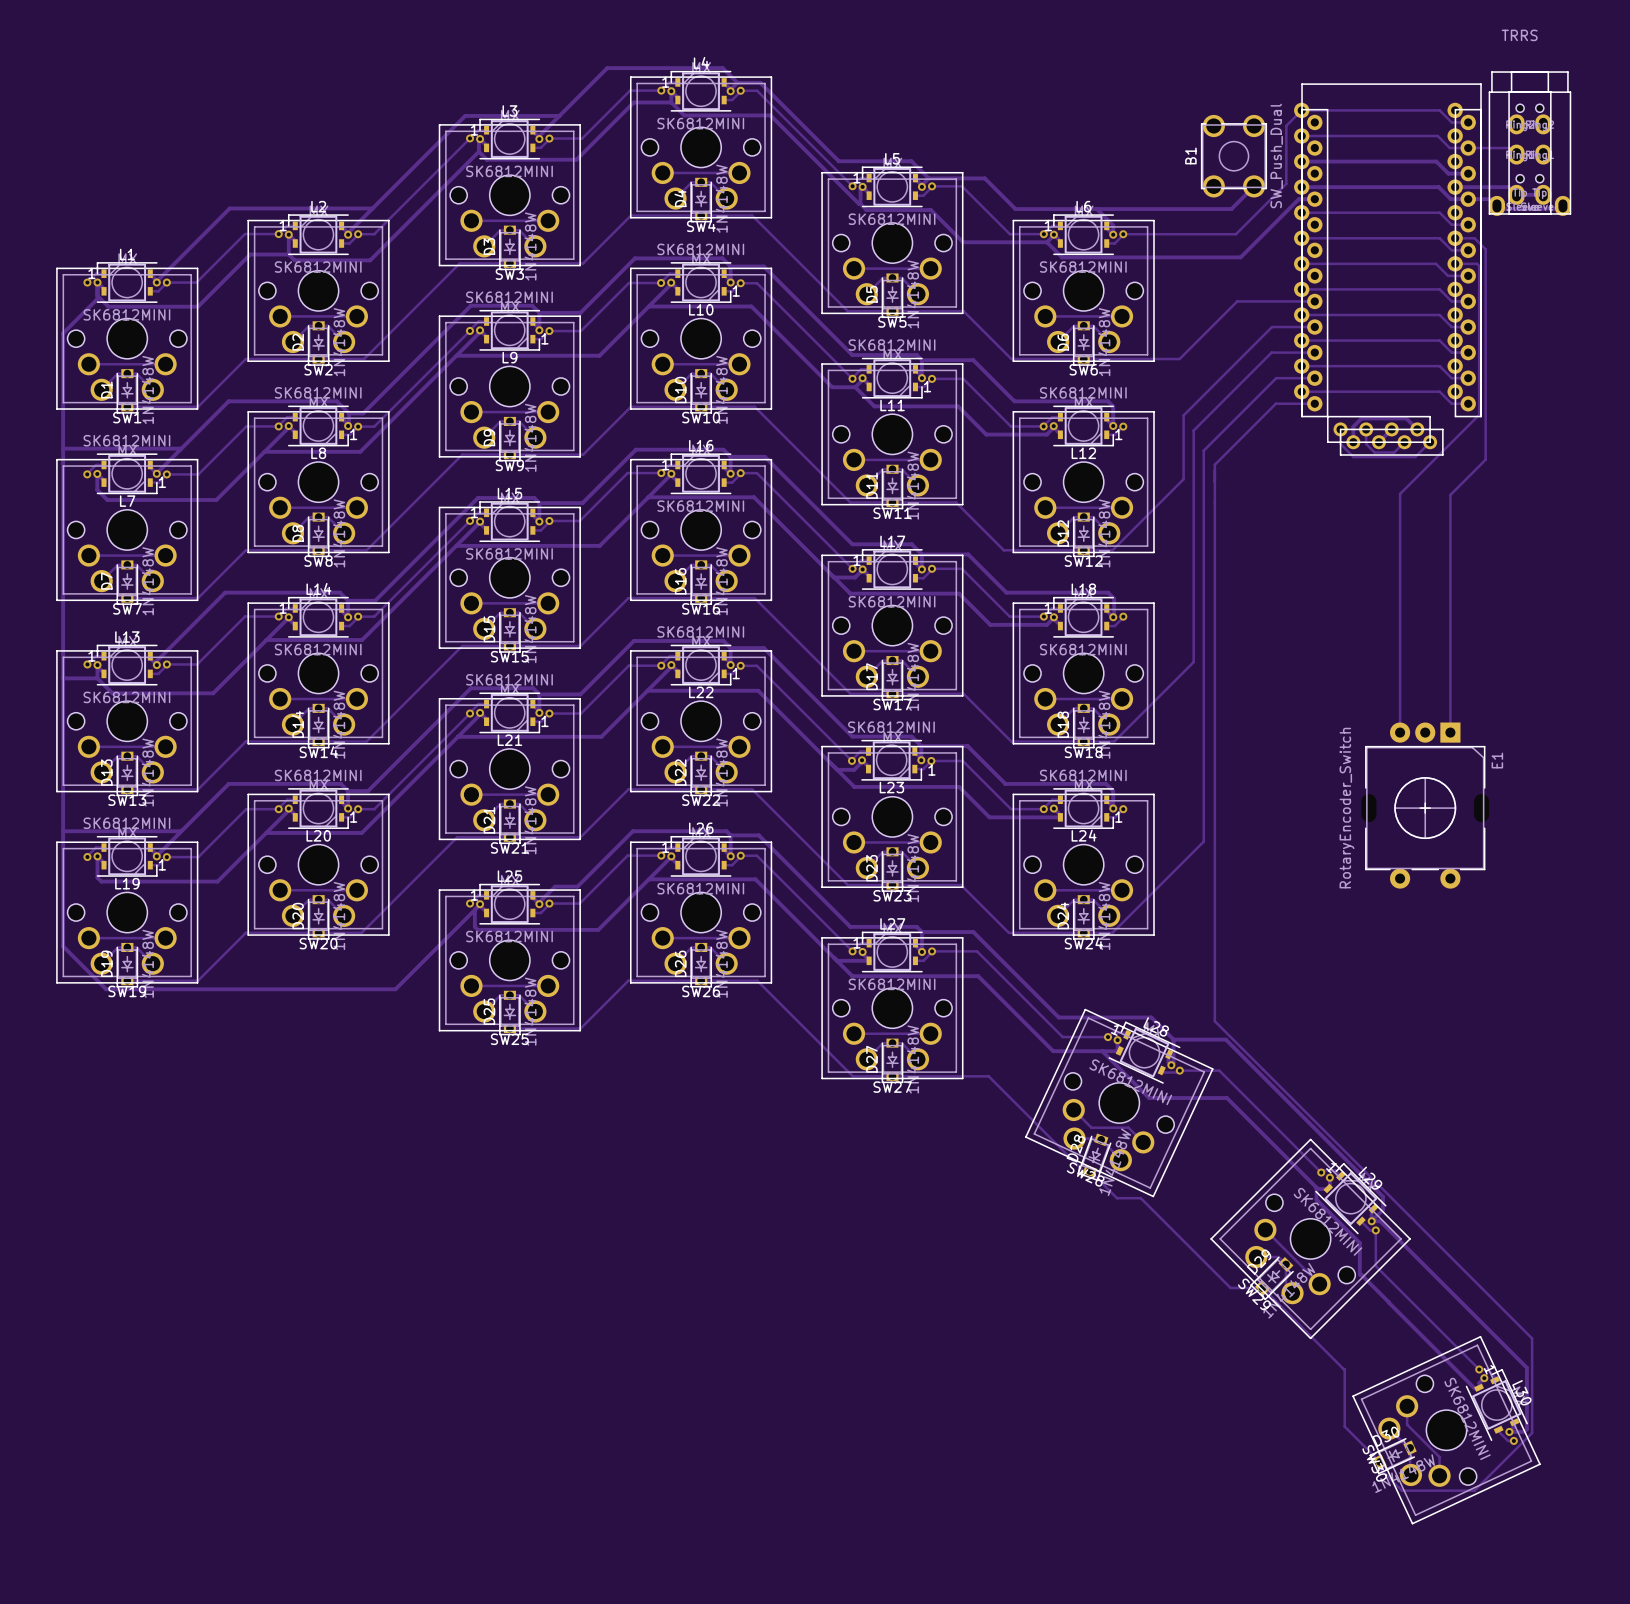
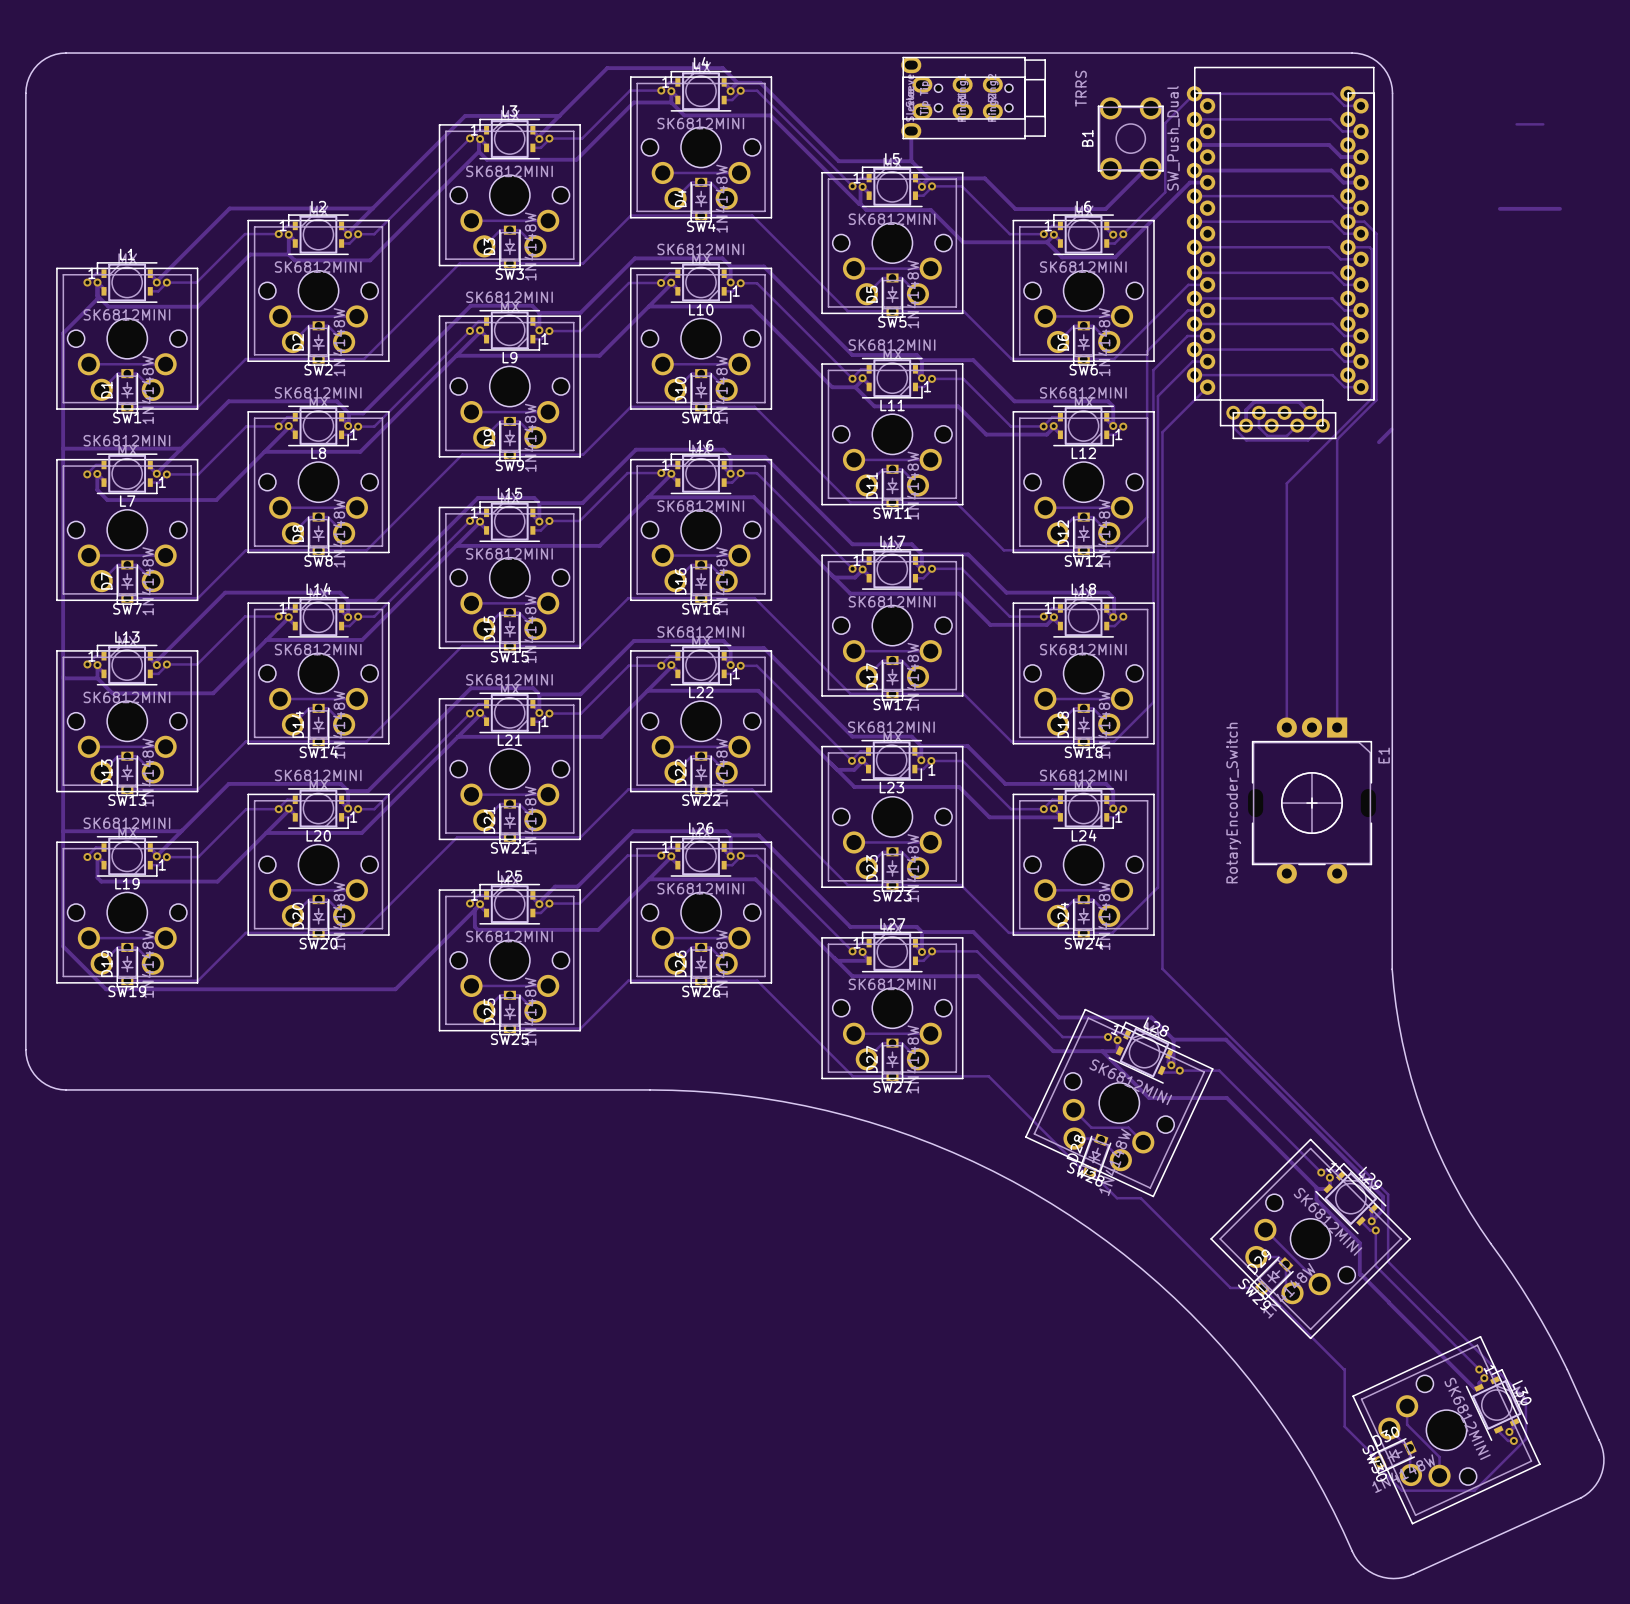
board edge: none -> (66, 53) (1352, 53) (1367, 56) (1380, 64) (1389, 77) (1392, 93) (1392, 969) (1396, 1005) (1402, 1042) (1416, 1095) (1443, 1164) (1470, 1212) (1541, 1320) (1567, 1369) (1600, 1444) (1603, 1458) (1603, 1467) (1598, 1481) (1592, 1488) (1581, 1497) (1408, 1575) (1388, 1578) (1373, 1573) (1364, 1568) (1354, 1556) (1312, 1472) (1263, 1397) (1221, 1346) (1158, 1283) (1088, 1228) (1012, 1181) (932, 1143) (847, 1116) (782, 1101) (694, 1091) (66, 1089) (50, 1086) (37, 1078) (28, 1065) (25, 1049) (25, 93) (28, 77) (37, 64) (50, 56) (66, 53)
part: none -> TRRS (973, 98)
track: none -> (1194, 119) (1330, 119) (1342, 131) (1360, 131)
track: (1468, 122) (1451, 122) (1439, 110) (1301, 110) (1286, 125) (1286, 183) (1235, 234) (1123, 234) -> (1360, 105) (1344, 105) (1332, 93) (1194, 93) (1165, 123) (1165, 192) (1123, 234)
track: none -> (911, 131) (911, 161)
track: (1301, 135) (1437, 135) (1449, 148) (1510, 148) (1516, 154) (1543, 154) -> none
part: TRRS (1529, 143) -> none
B1 position: (1233, 156) -> (1130, 138)
track: (1301, 161) (1436, 161) (1448, 173) (1468, 173) -> (1194, 144) (1329, 144) (1341, 157) (1360, 157)
track: none -> (1194, 170) (1331, 170) (1343, 182) (1360, 182)
track: (1254, 186) (1231, 209) (1105, 209) -> (1150, 163) (1105, 209)
track: (1301, 187) (1438, 187) (1450, 199) (1490, 199) (1496, 205) -> none
track: (1455, 187) (1508, 187) (1516, 194) (1543, 194) -> none
track: (1314, 199) (1298, 199) (1240, 257) (1115, 257) -> (1207, 182) (1189, 182) (1115, 257)
track: (1096, 209) (1113, 225) (1113, 234) -> none
track: (1301, 212) (1439, 212) (1451, 224) (1468, 224) -> (1194, 196) (1332, 196) (1344, 208) (1360, 208)
track: none -> (1347, 221) (1364, 221) (1376, 233) (1376, 400) (1337, 439) (1337, 727)
track: (1301, 238) (1439, 238) (1451, 250) (1468, 250) -> (1194, 221) (1332, 221) (1344, 233) (1360, 233)
track: (1455, 238) (1474, 238) (1485, 249) (1485, 459) (1450, 494) (1450, 732) -> none
track: none -> (1347, 247) (1369, 247) (1371, 249) (1371, 398) (1286, 483) (1286, 727)
part position: (1387, 250) -> (1280, 233)
track: (1301, 263) (1435, 263) (1448, 275) (1468, 275) -> (1194, 247) (1328, 247) (1340, 259) (1360, 259)
track: (1455, 263) (1477, 263) (1479, 266) (1479, 414) (1400, 493) (1400, 732) -> none
track: (1301, 289) (1439, 289) (1451, 301) (1468, 301) -> (1194, 272) (1332, 272) (1344, 284) (1360, 284)
track: (1314, 301) (1237, 301) (1179, 359) (1114, 359) -> (1207, 284) (1188, 284) (1114, 359)
track: (1301, 314) (1439, 314) (1451, 327) (1468, 327) -> (1194, 298) (1332, 298) (1344, 310) (1360, 310)
track: (1314, 327) (1272, 327) (1183, 415) (1183, 479) (1112, 550) -> (1207, 310) (1187, 310) (1147, 351) (1147, 517) (1112, 550)
track: (1301, 340) (1439, 340) (1451, 352) (1468, 352) -> (1194, 323) (1332, 323) (1344, 336) (1360, 336)
track: (1314, 352) (1271, 352) (1193, 430) (1193, 662) (1153, 702) -> (1207, 336) (1187, 336) (1153, 370) (1153, 702)
track: (1301, 366) (1439, 366) (1451, 378) (1468, 378) -> (1194, 349) (1332, 349) (1344, 361) (1360, 361)
track: (1314, 378) (1276, 378) (1203, 450) (1203, 841) (1157, 887) -> (1207, 361) (1192, 361) (1157, 396) (1157, 887)
track: (1301, 391) (1439, 391) (1451, 403) (1468, 403) -> (1194, 375) (1332, 375) (1344, 387) (1360, 387)
track: (1314, 403) (1275, 403) (1214, 464) (1214, 1021) -> (1207, 387) (1162, 432) (1162, 968) (1214, 1021)
track: (1340, 429) (1340, 443) (1353, 457) (1415, 457) (1430, 442) -> (1233, 412) (1233, 427) (1246, 440) (1308, 440) (1322, 425)
track: (1366, 429) (1366, 443) (1374, 452) (1394, 452) (1404, 442) -> (1258, 412) (1258, 427) (1267, 435) (1286, 435) (1297, 425)
track: (1417, 429) (1406, 418) (1361, 418) (1353, 426) (1353, 442) -> (1310, 412) (1299, 401) (1254, 401) (1246, 410) (1246, 425)
part position: (1385, 435) -> (1278, 419)
E1 position: (1425, 805) -> (1311, 800)
track: (1388, 1194) (1532, 1338) (1532, 1433) (1525, 1439) -> (1438, 1311) (1525, 1399) (1525, 1439)
track: none -> (1388, 1194) (1388, 1261) (1437, 1311)
track: (1371, 1221) (1380, 1221) (1526, 1367) (1526, 1429) (1524, 1431) (1509, 1431) -> none

